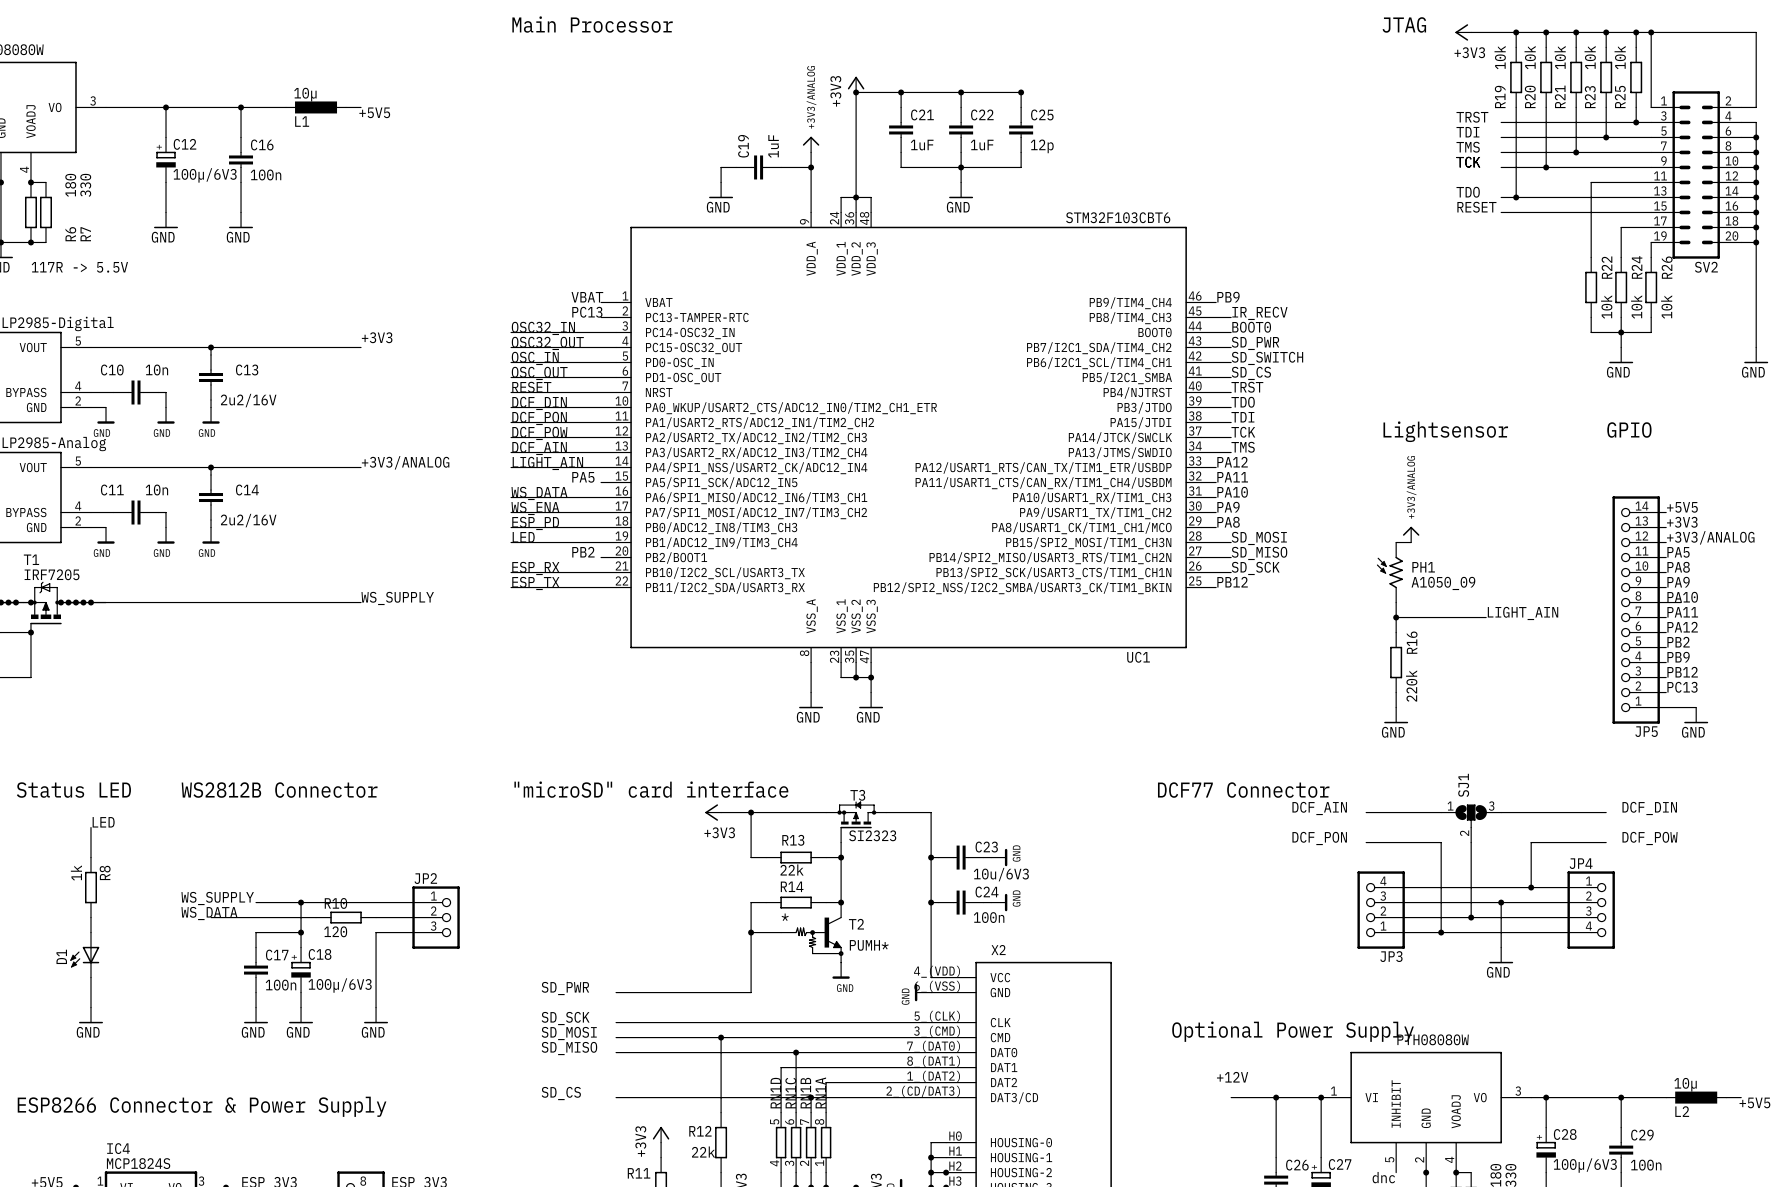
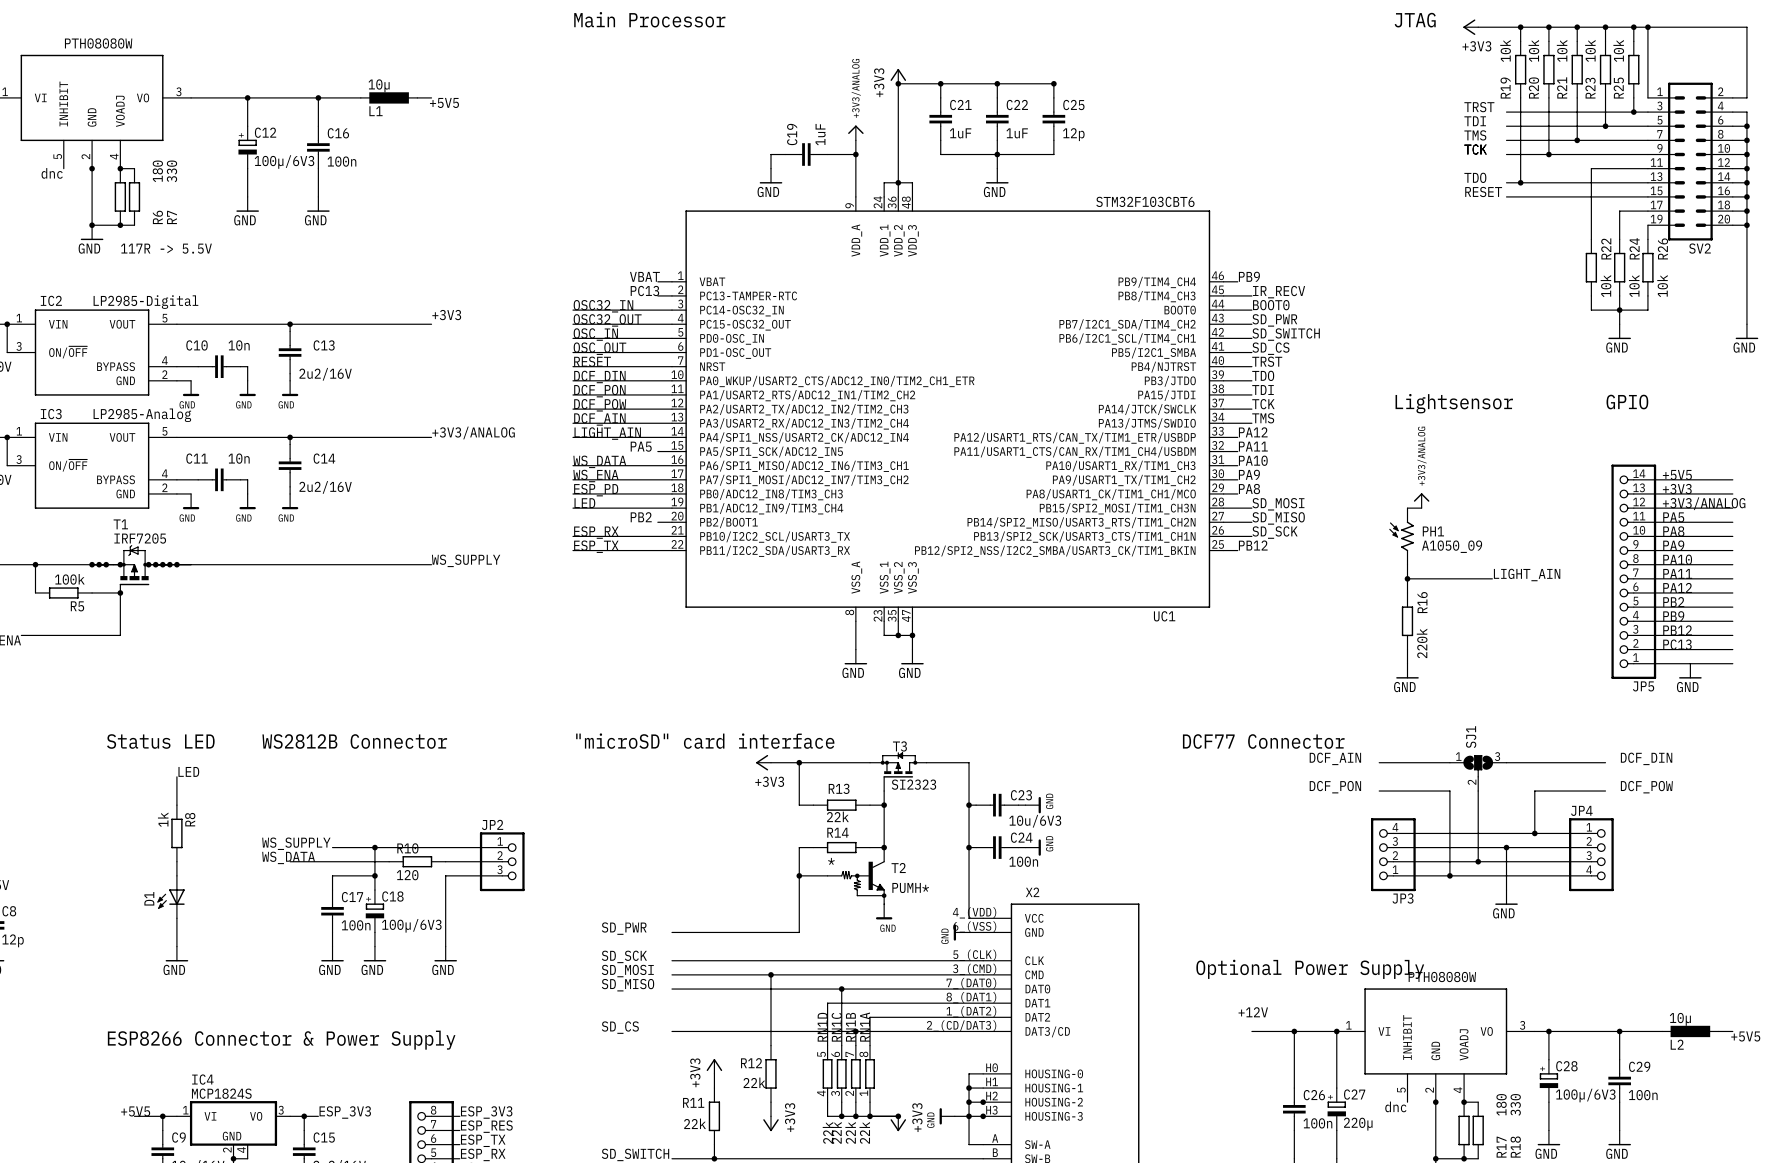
wire: none -> (1662, 479) (1732, 479)
wire: none -> (1662, 493) (1732, 493)
wire: none -> (1662, 508) (1732, 508)
wire: none -> (1662, 522) (1732, 522)
wire: none -> (1662, 536) (1732, 536)
wire: none -> (1662, 550) (1732, 550)
wire: none -> (1676, 564) (1732, 564)
wire: none -> (1662, 578) (1732, 578)
wire: none -> (1662, 592) (1732, 592)
wire: none -> (1662, 607) (1732, 607)
wire: none -> (1662, 621) (1732, 621)
wire: none -> (1662, 635) (1732, 635)
wire: none -> (1662, 649) (1732, 649)
wire: none -> (1690, 663) (1732, 663)

